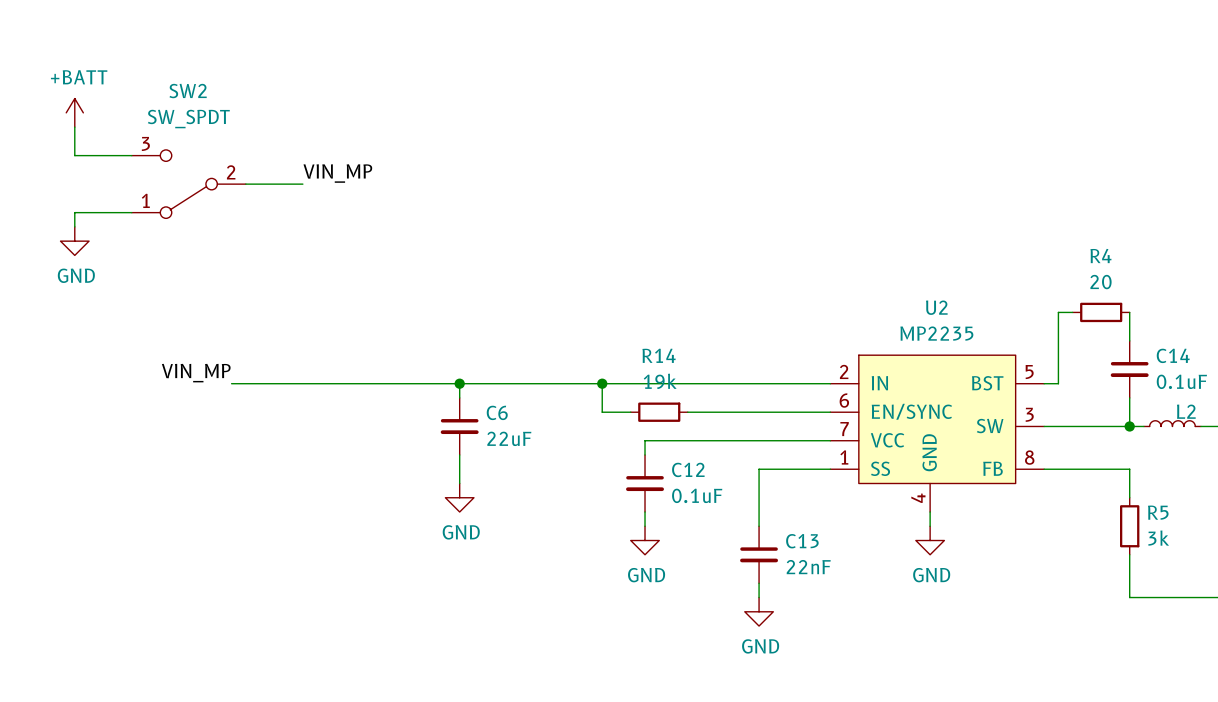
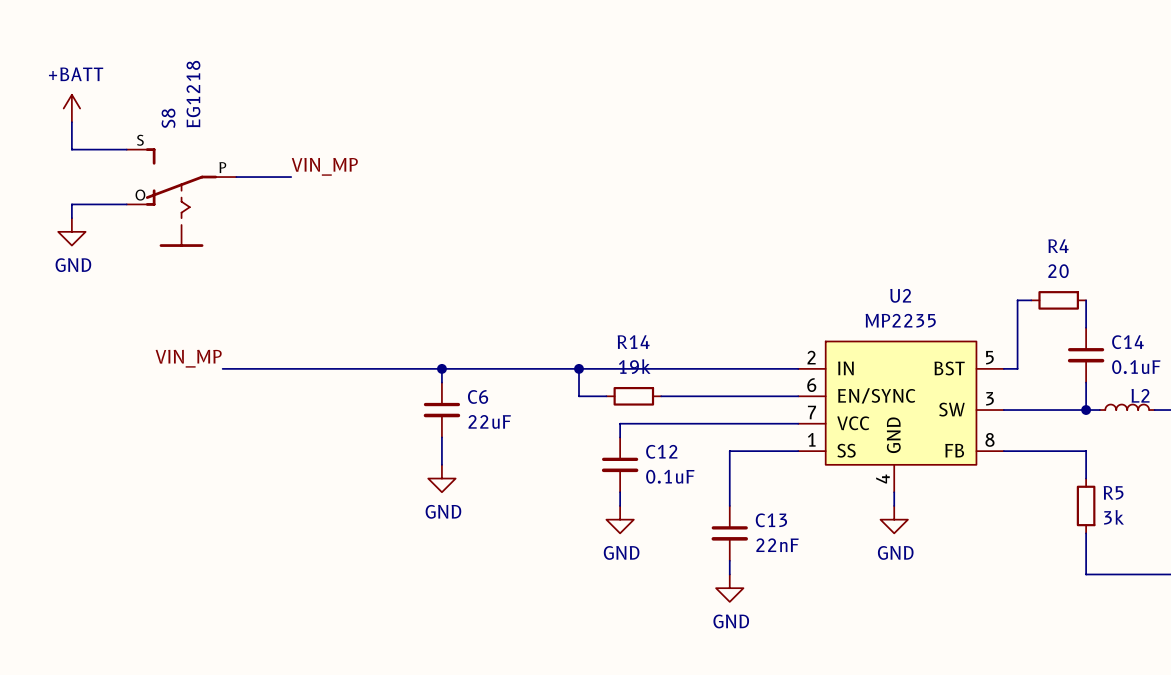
SW2: SW_SPDT (188, 184) -> none
S8: none -> EG1218 (181, 197)

